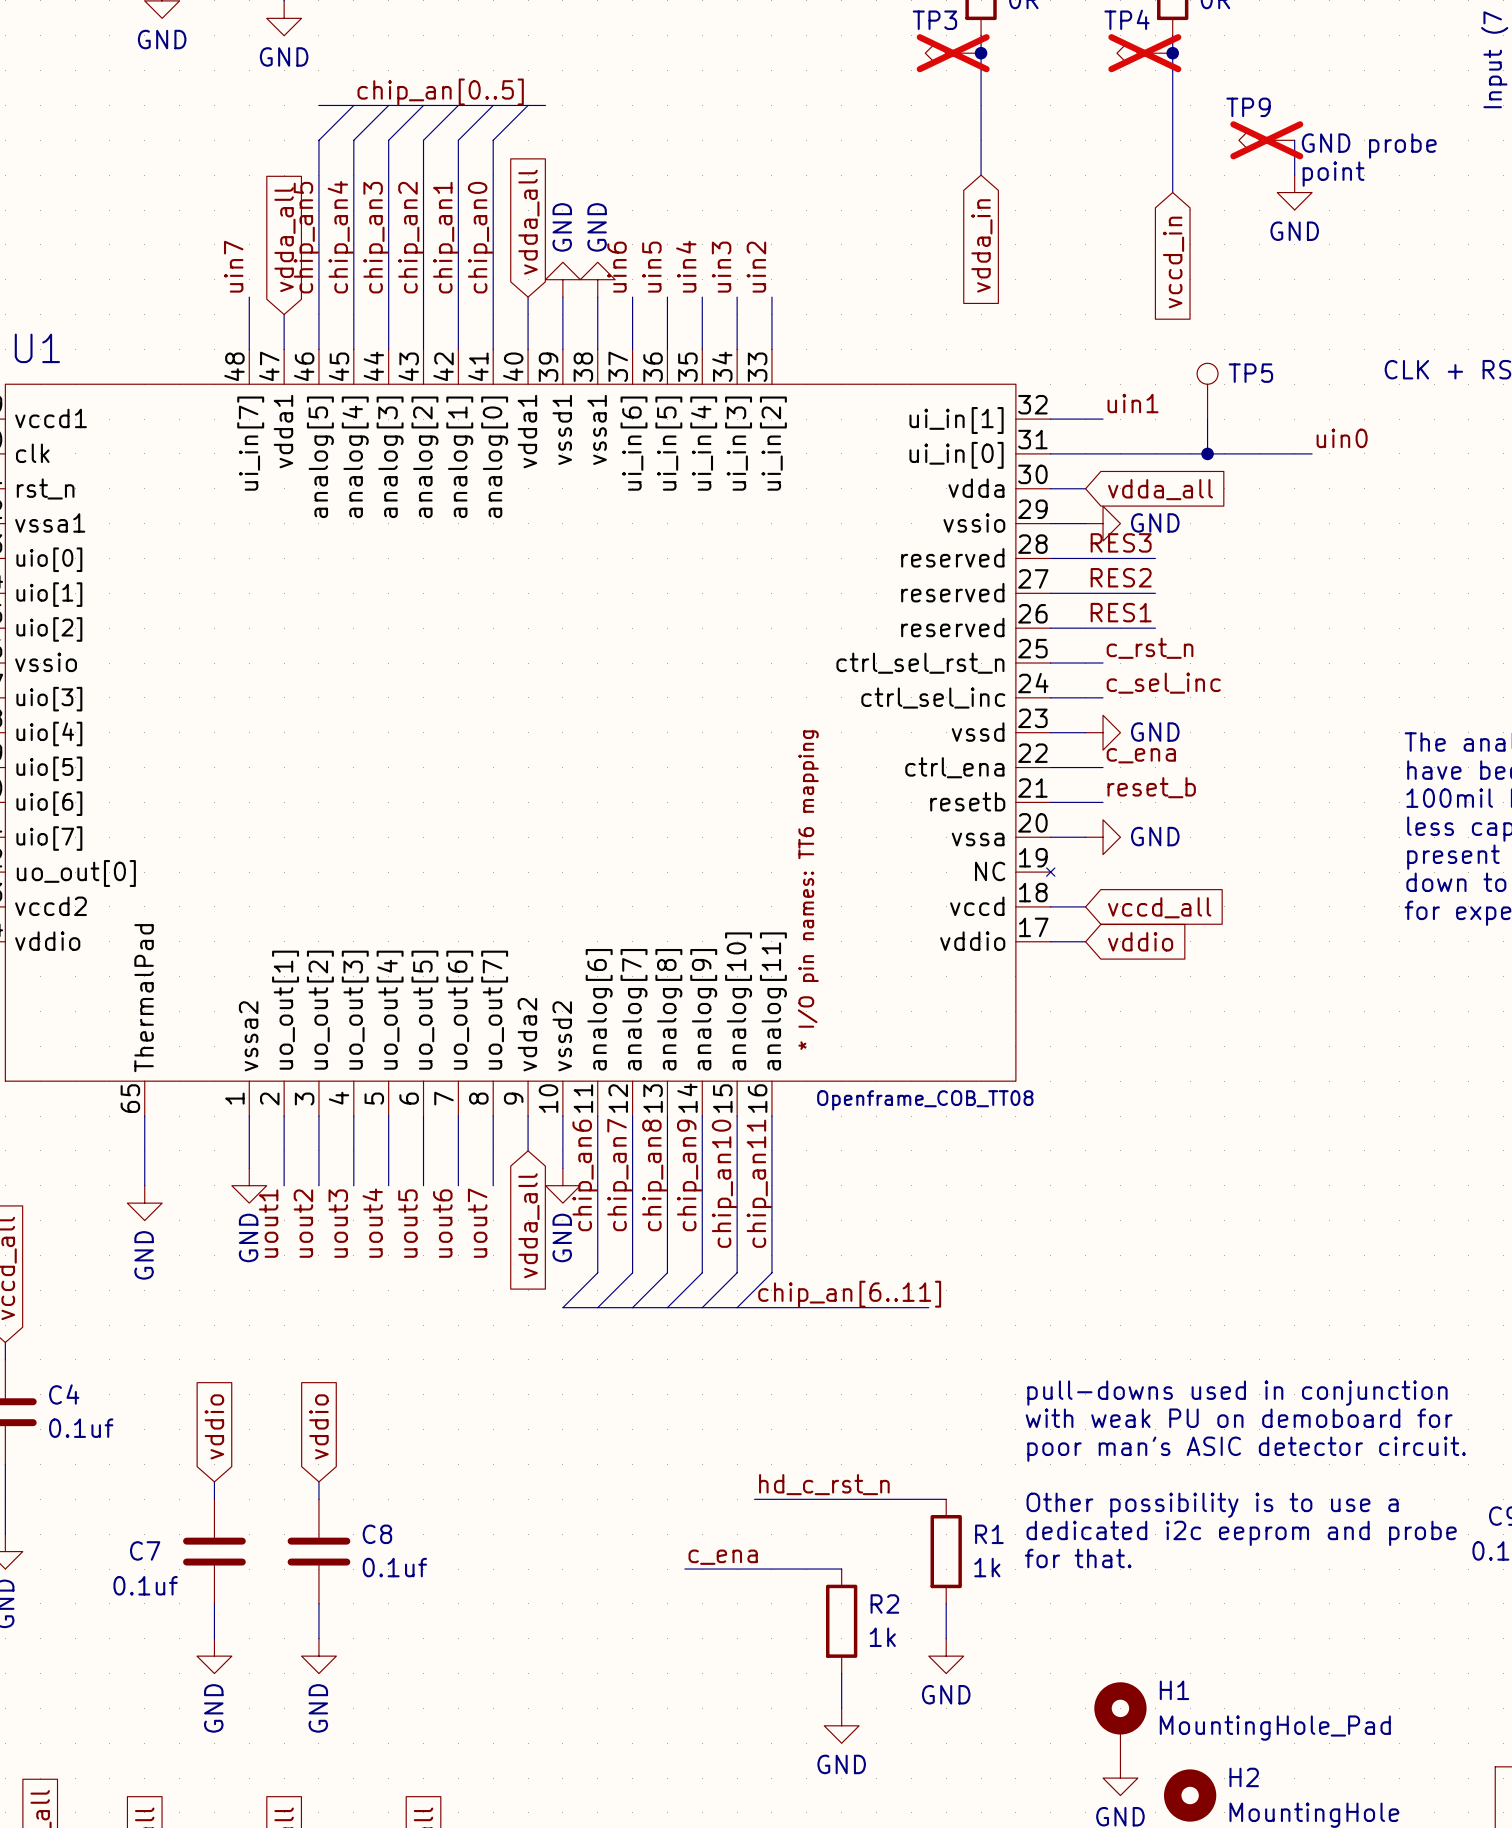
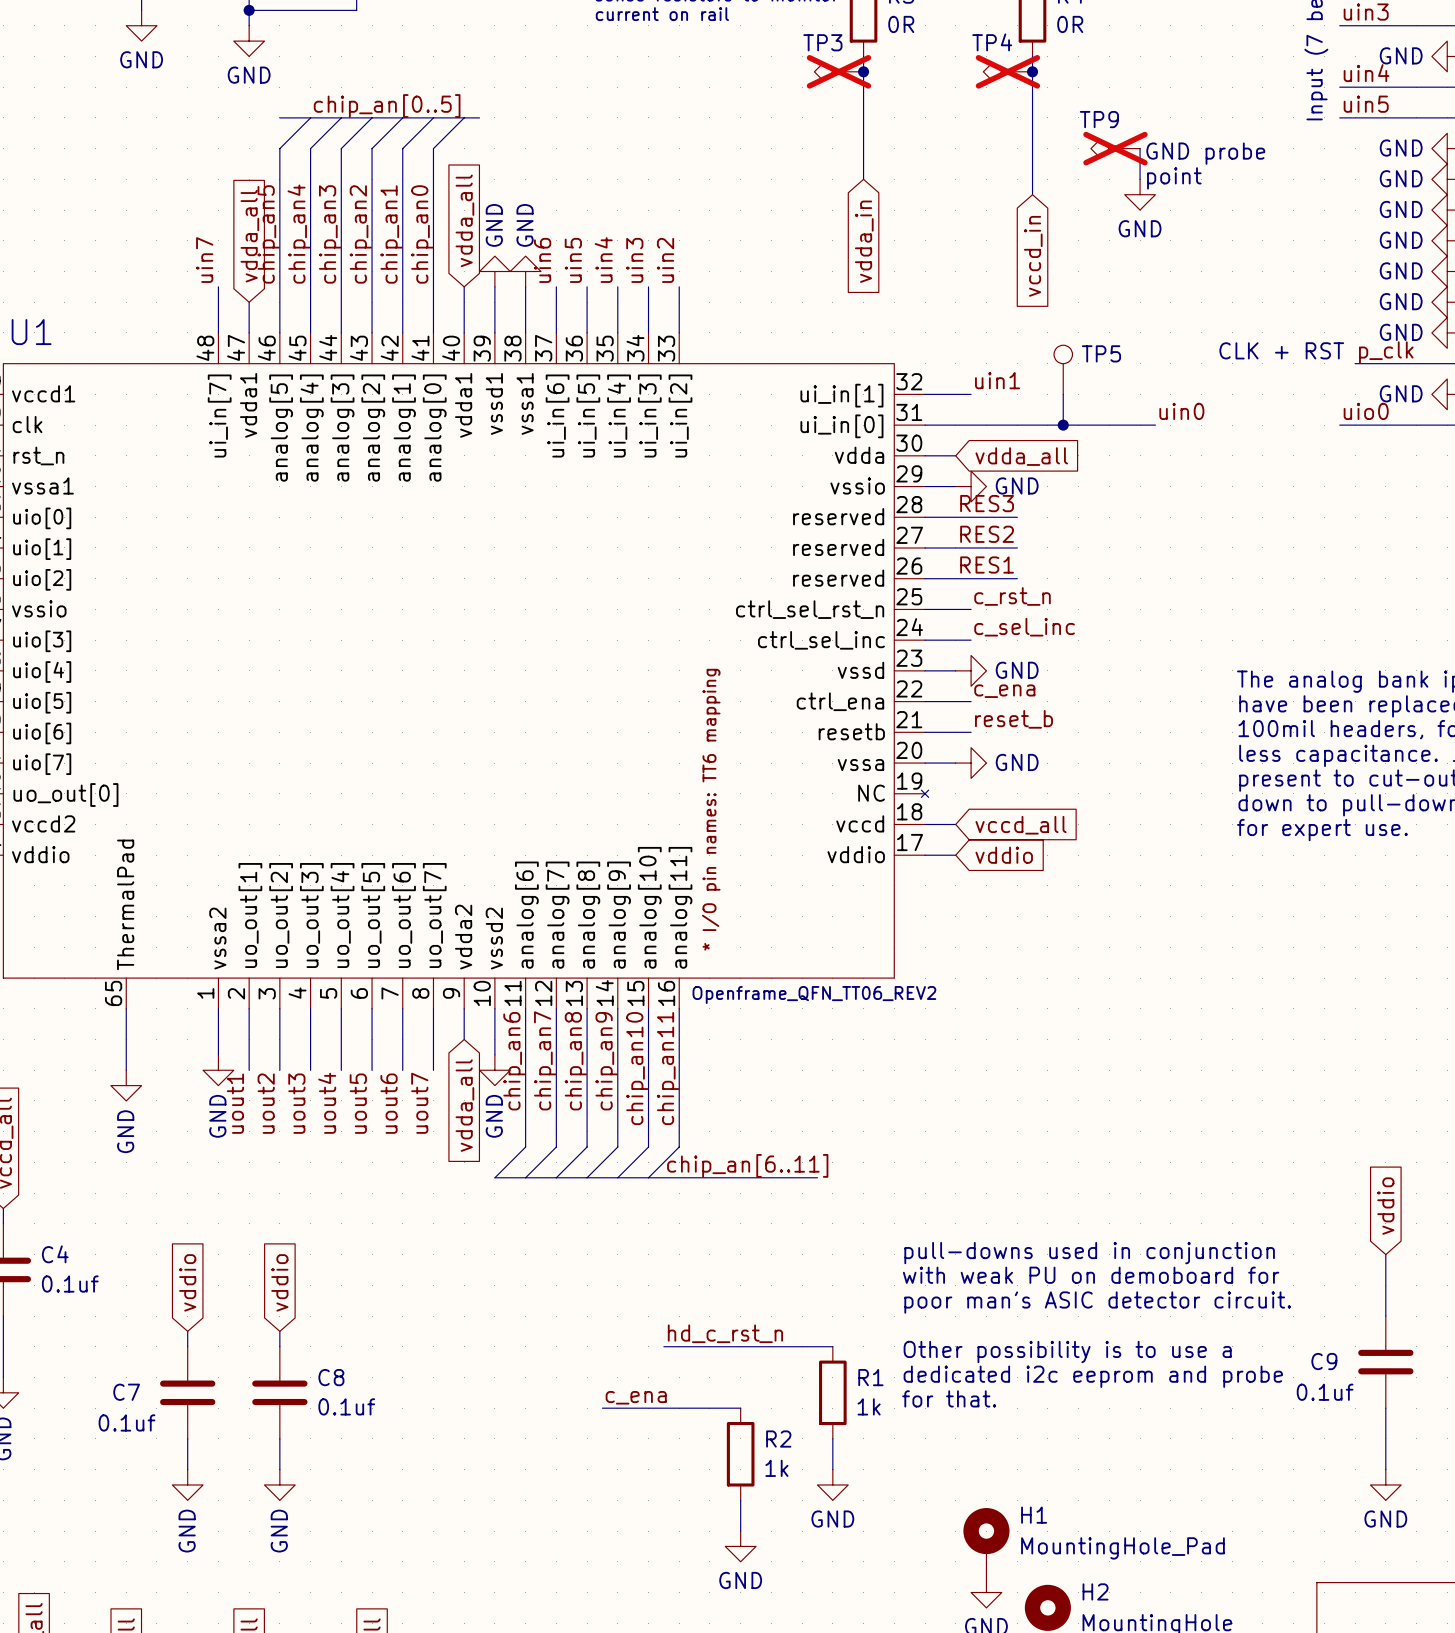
U1 value: Openframe_COB_TT08 (925, 1100) -> Openframe_QFN_TT06_REV2 (814, 995)

